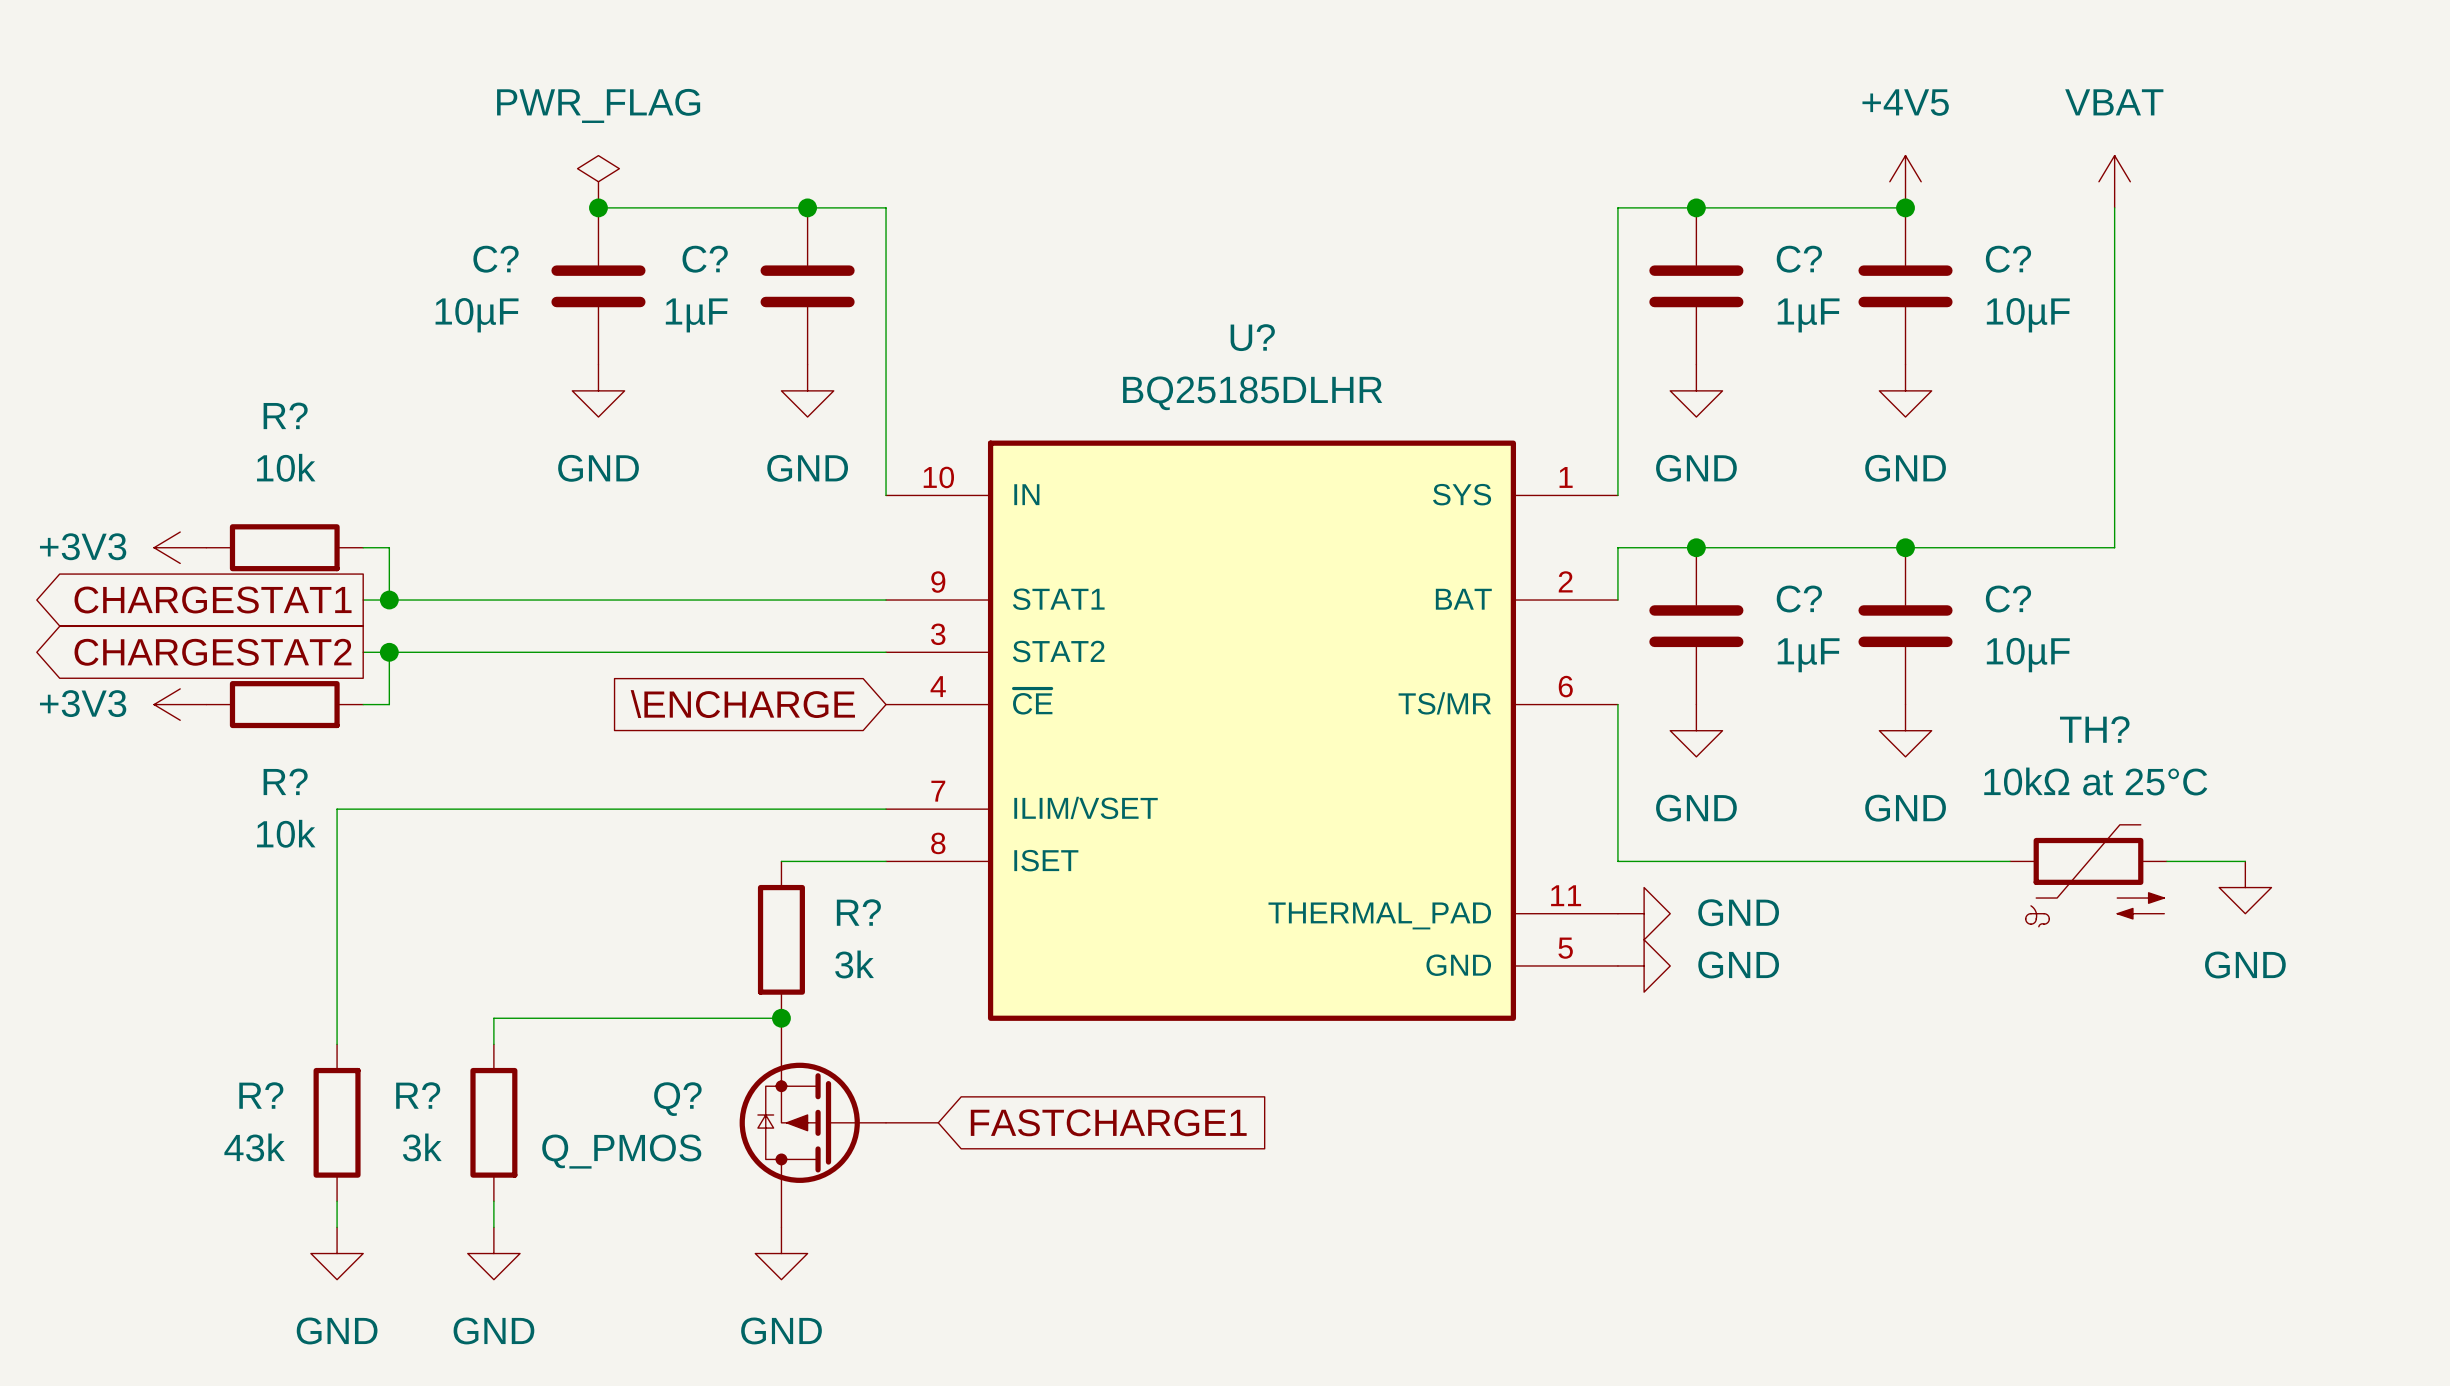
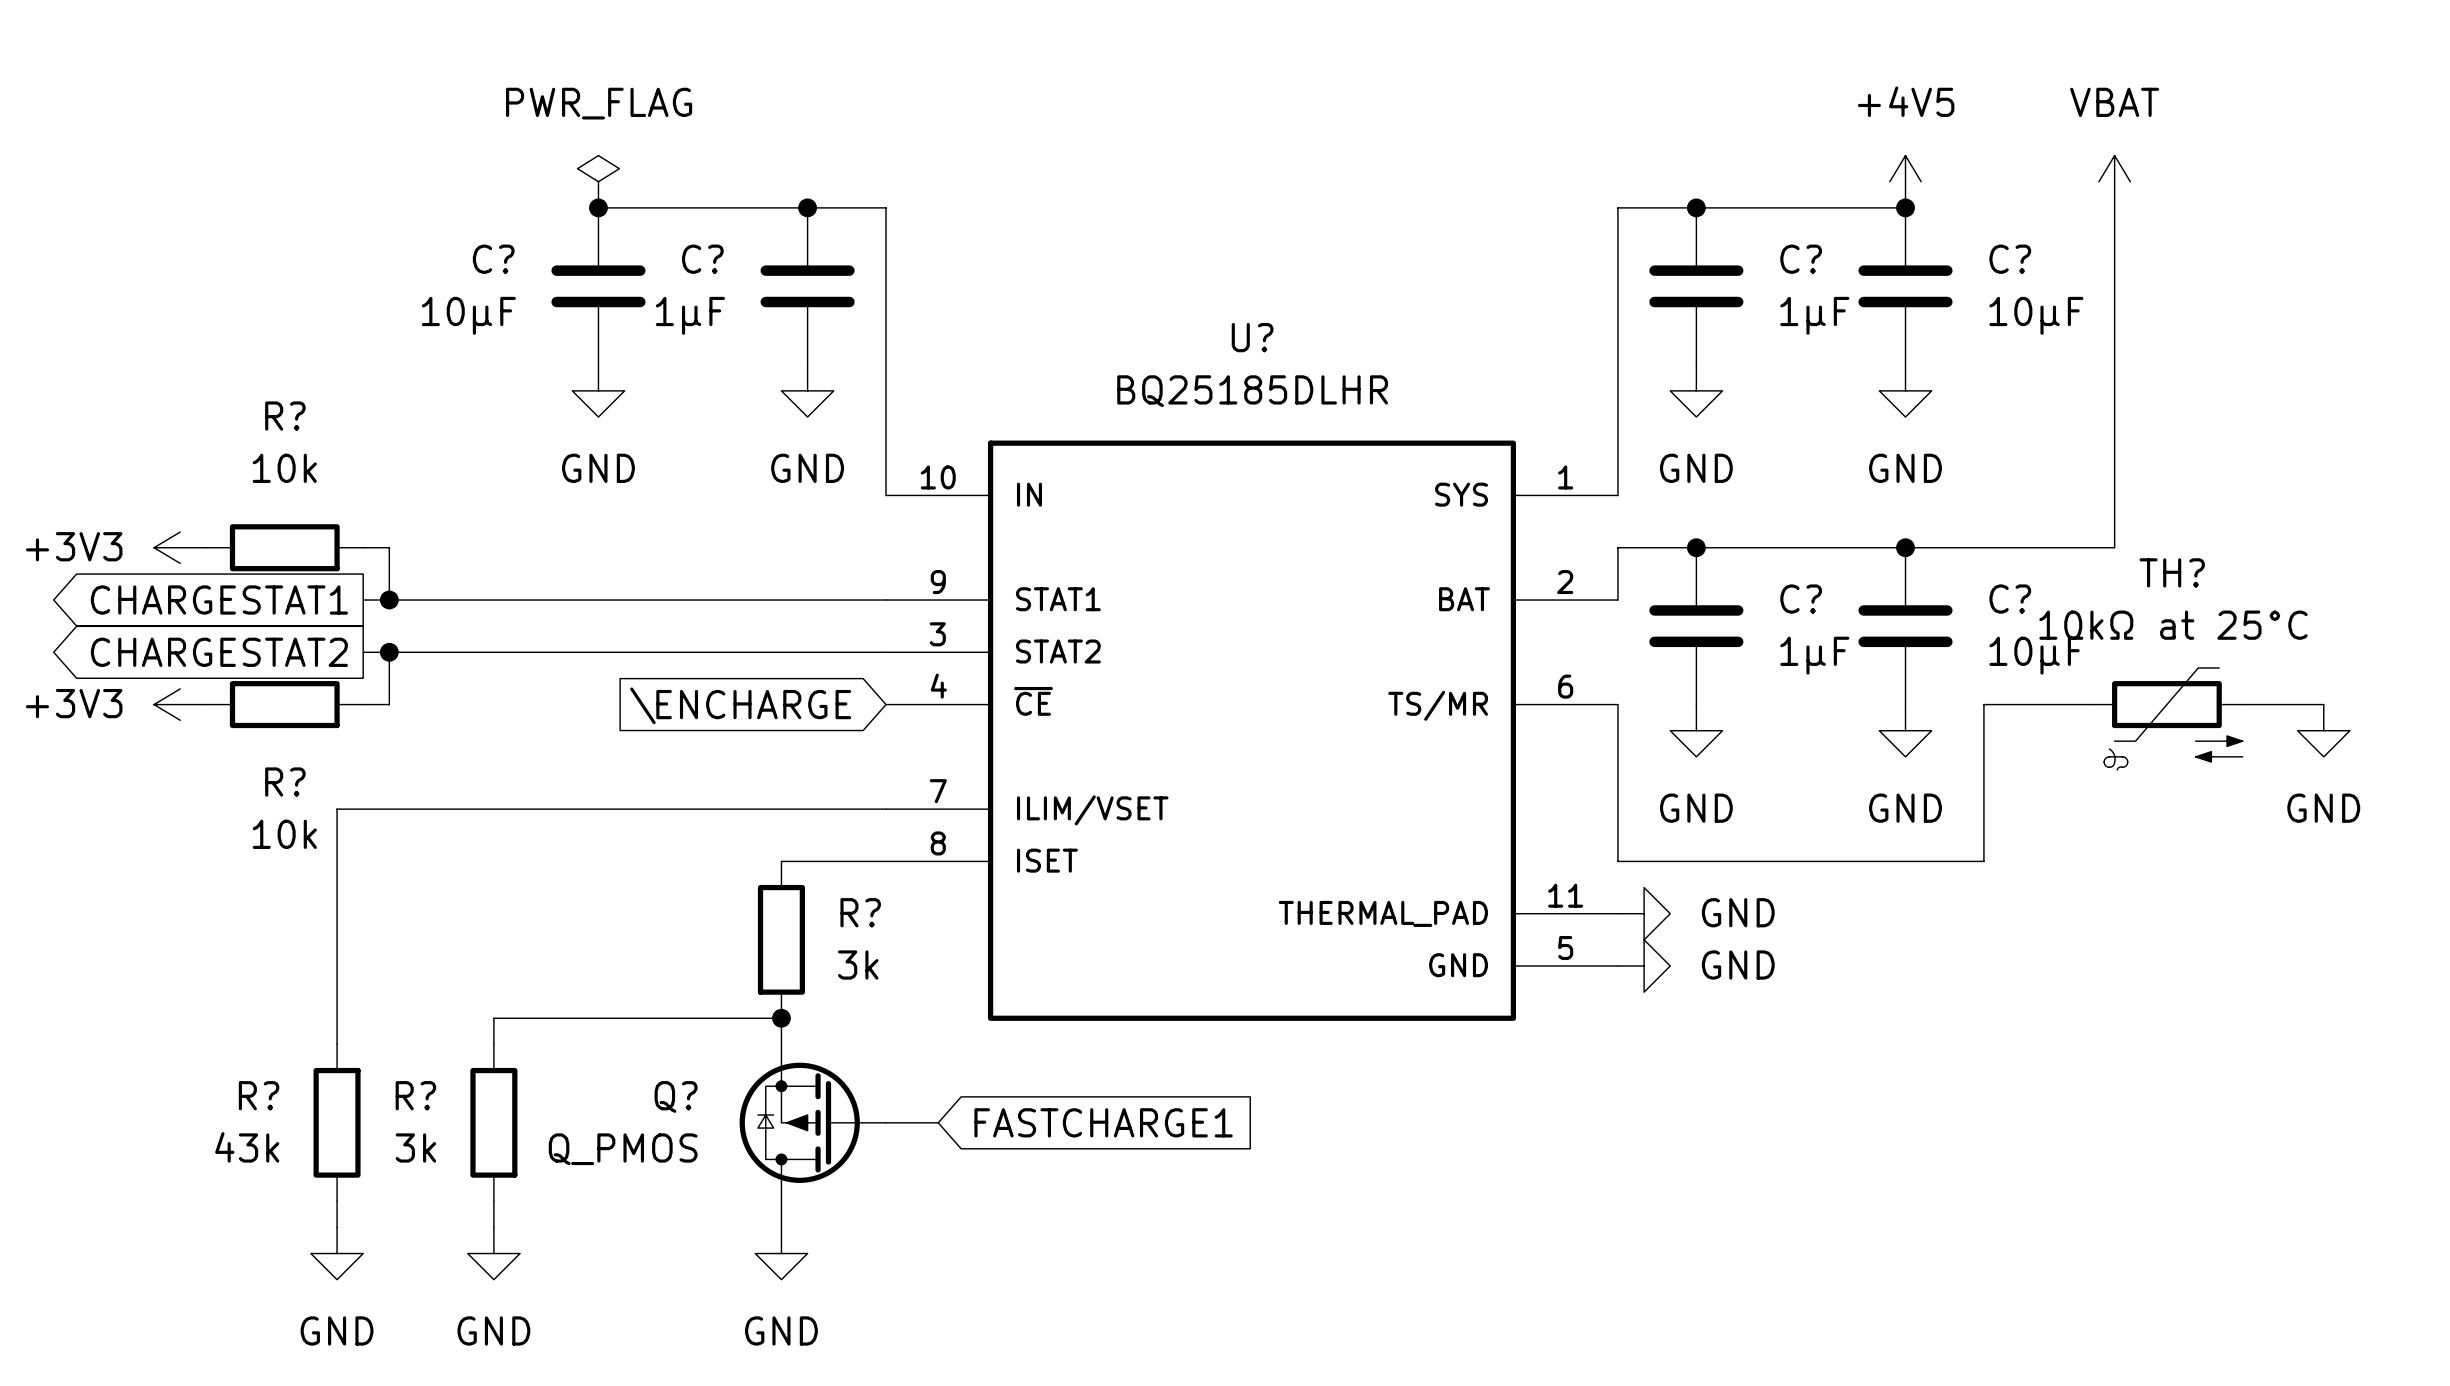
wire: (1983, 861) (2010, 861) -> (1983, 861) (1983, 704) (2088, 704)
wire: (2166, 861) (2245, 861) -> (2245, 704) (2323, 704)
TH? position: (2088, 875) -> (2166, 718)
power symbol position: GND (2245, 887) -> GND (2323, 730)

